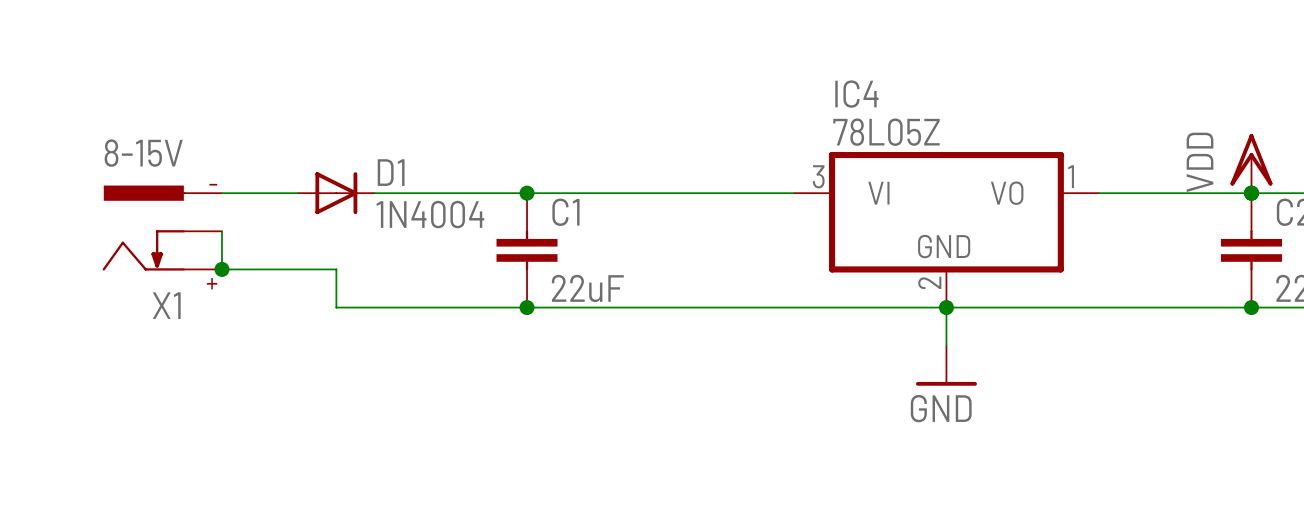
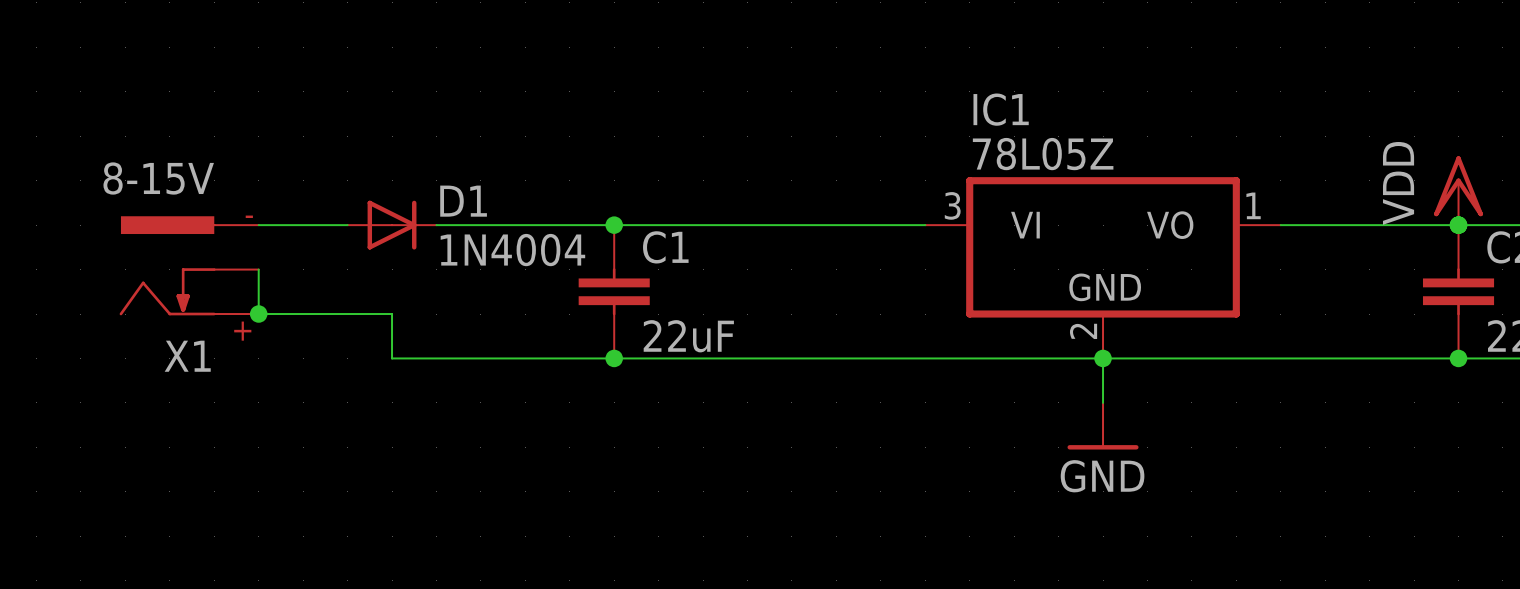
IC4 name: IC4 (856, 94) -> IC1 (1001, 109)

